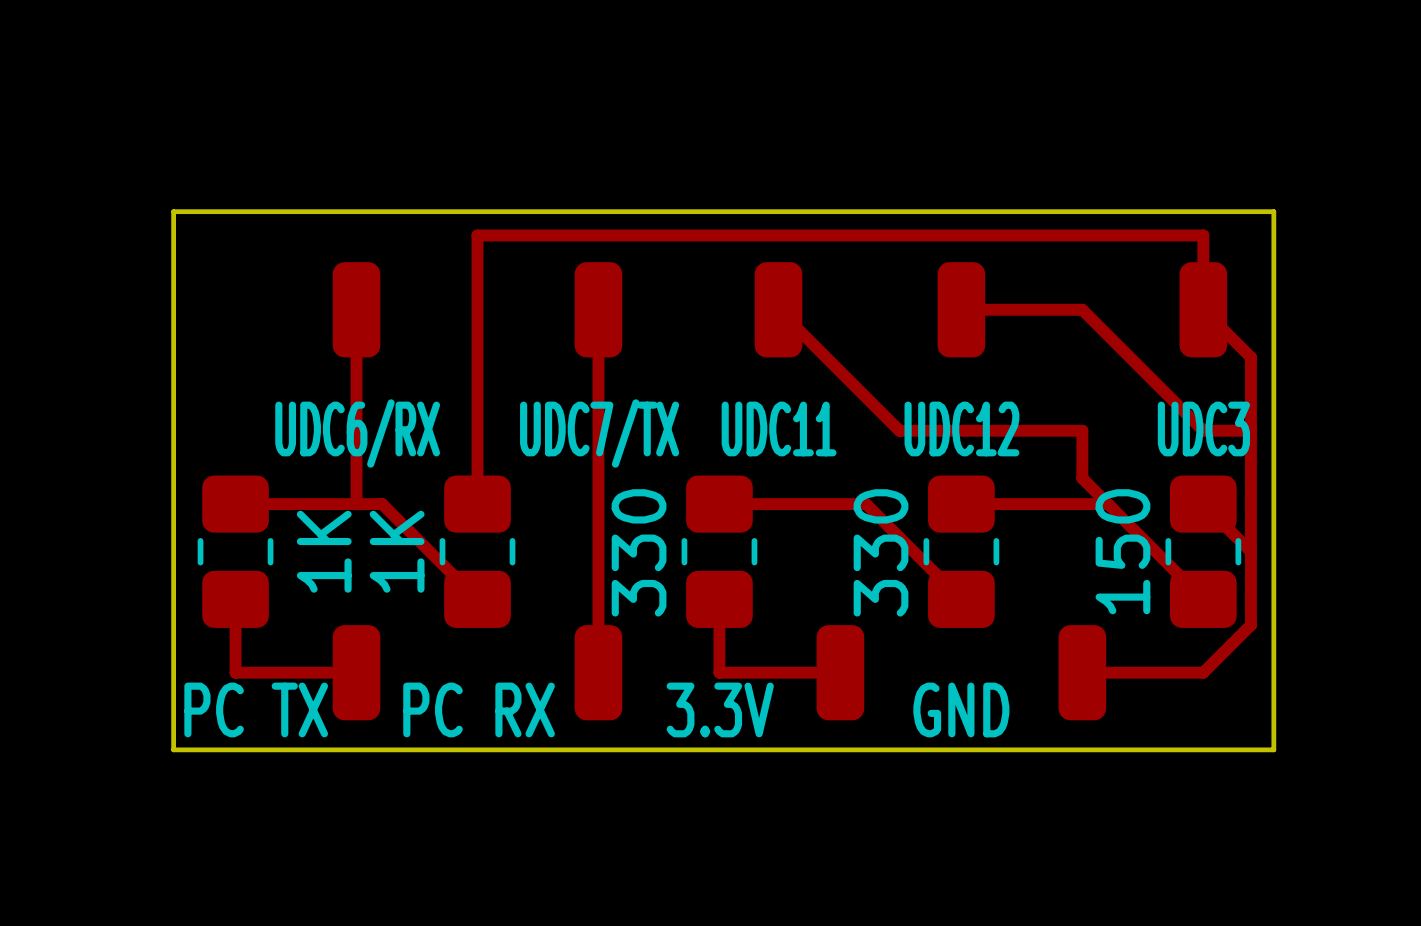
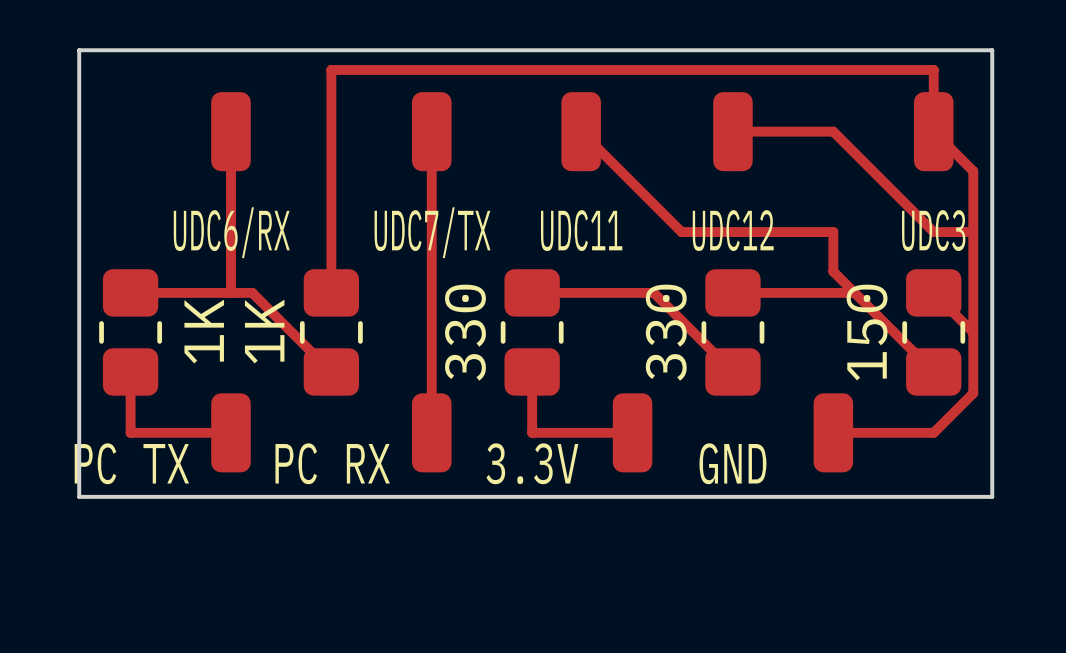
PC TX name position: PC TX (256, 709) -> PC TX (131, 463)

